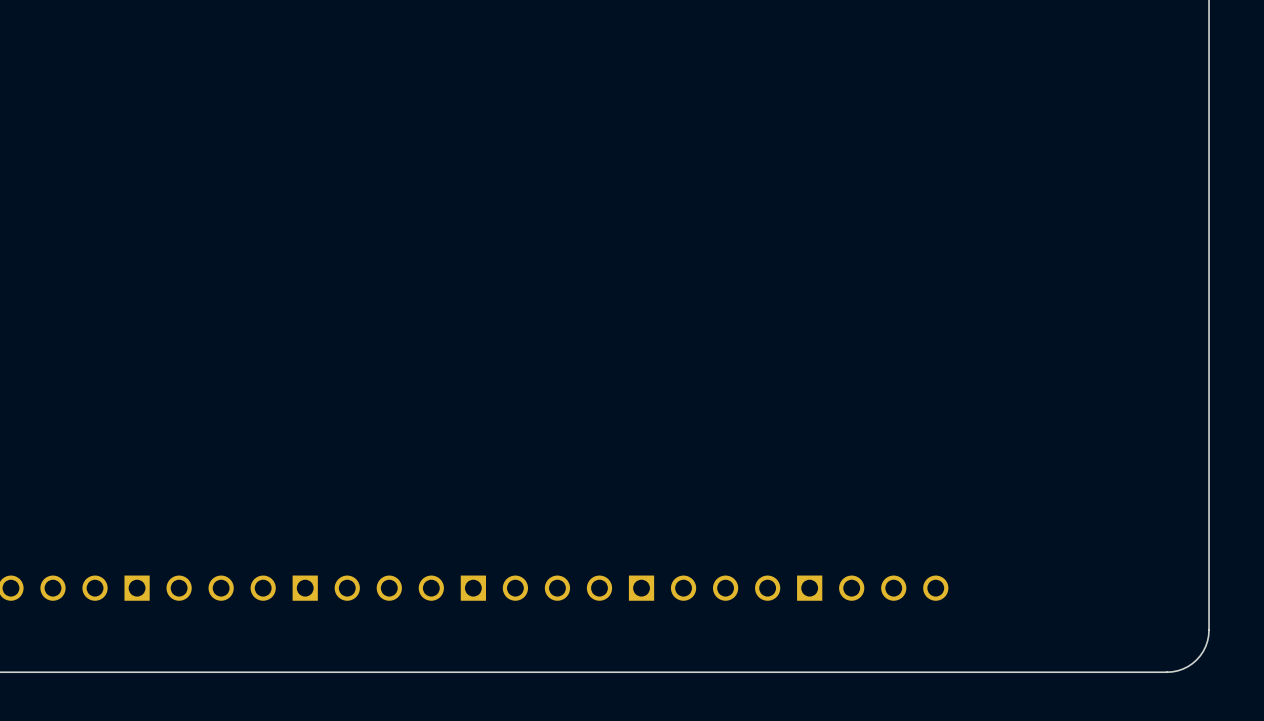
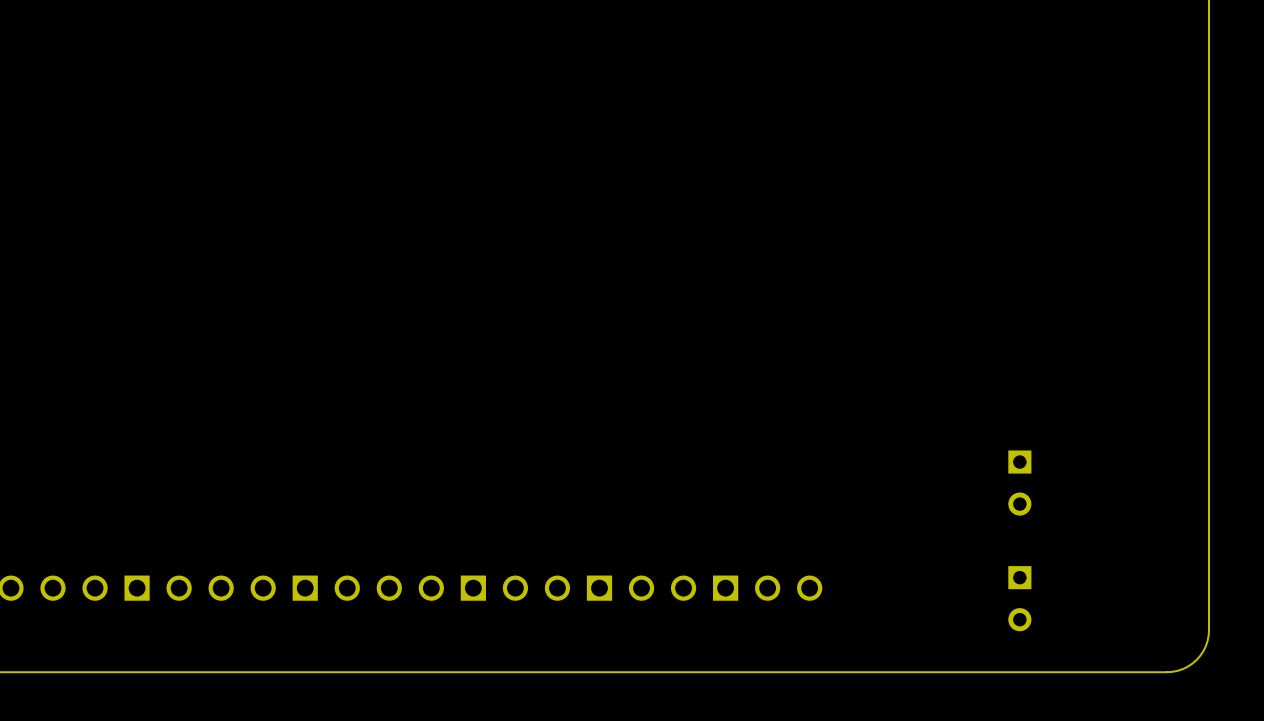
part: none -> (1019, 483)
part: (536, 588) -> none
part: none -> (641, 588)
part: (704, 588) -> none
part: none -> (767, 588)
part: (872, 588) -> none
part: none -> (1019, 598)

